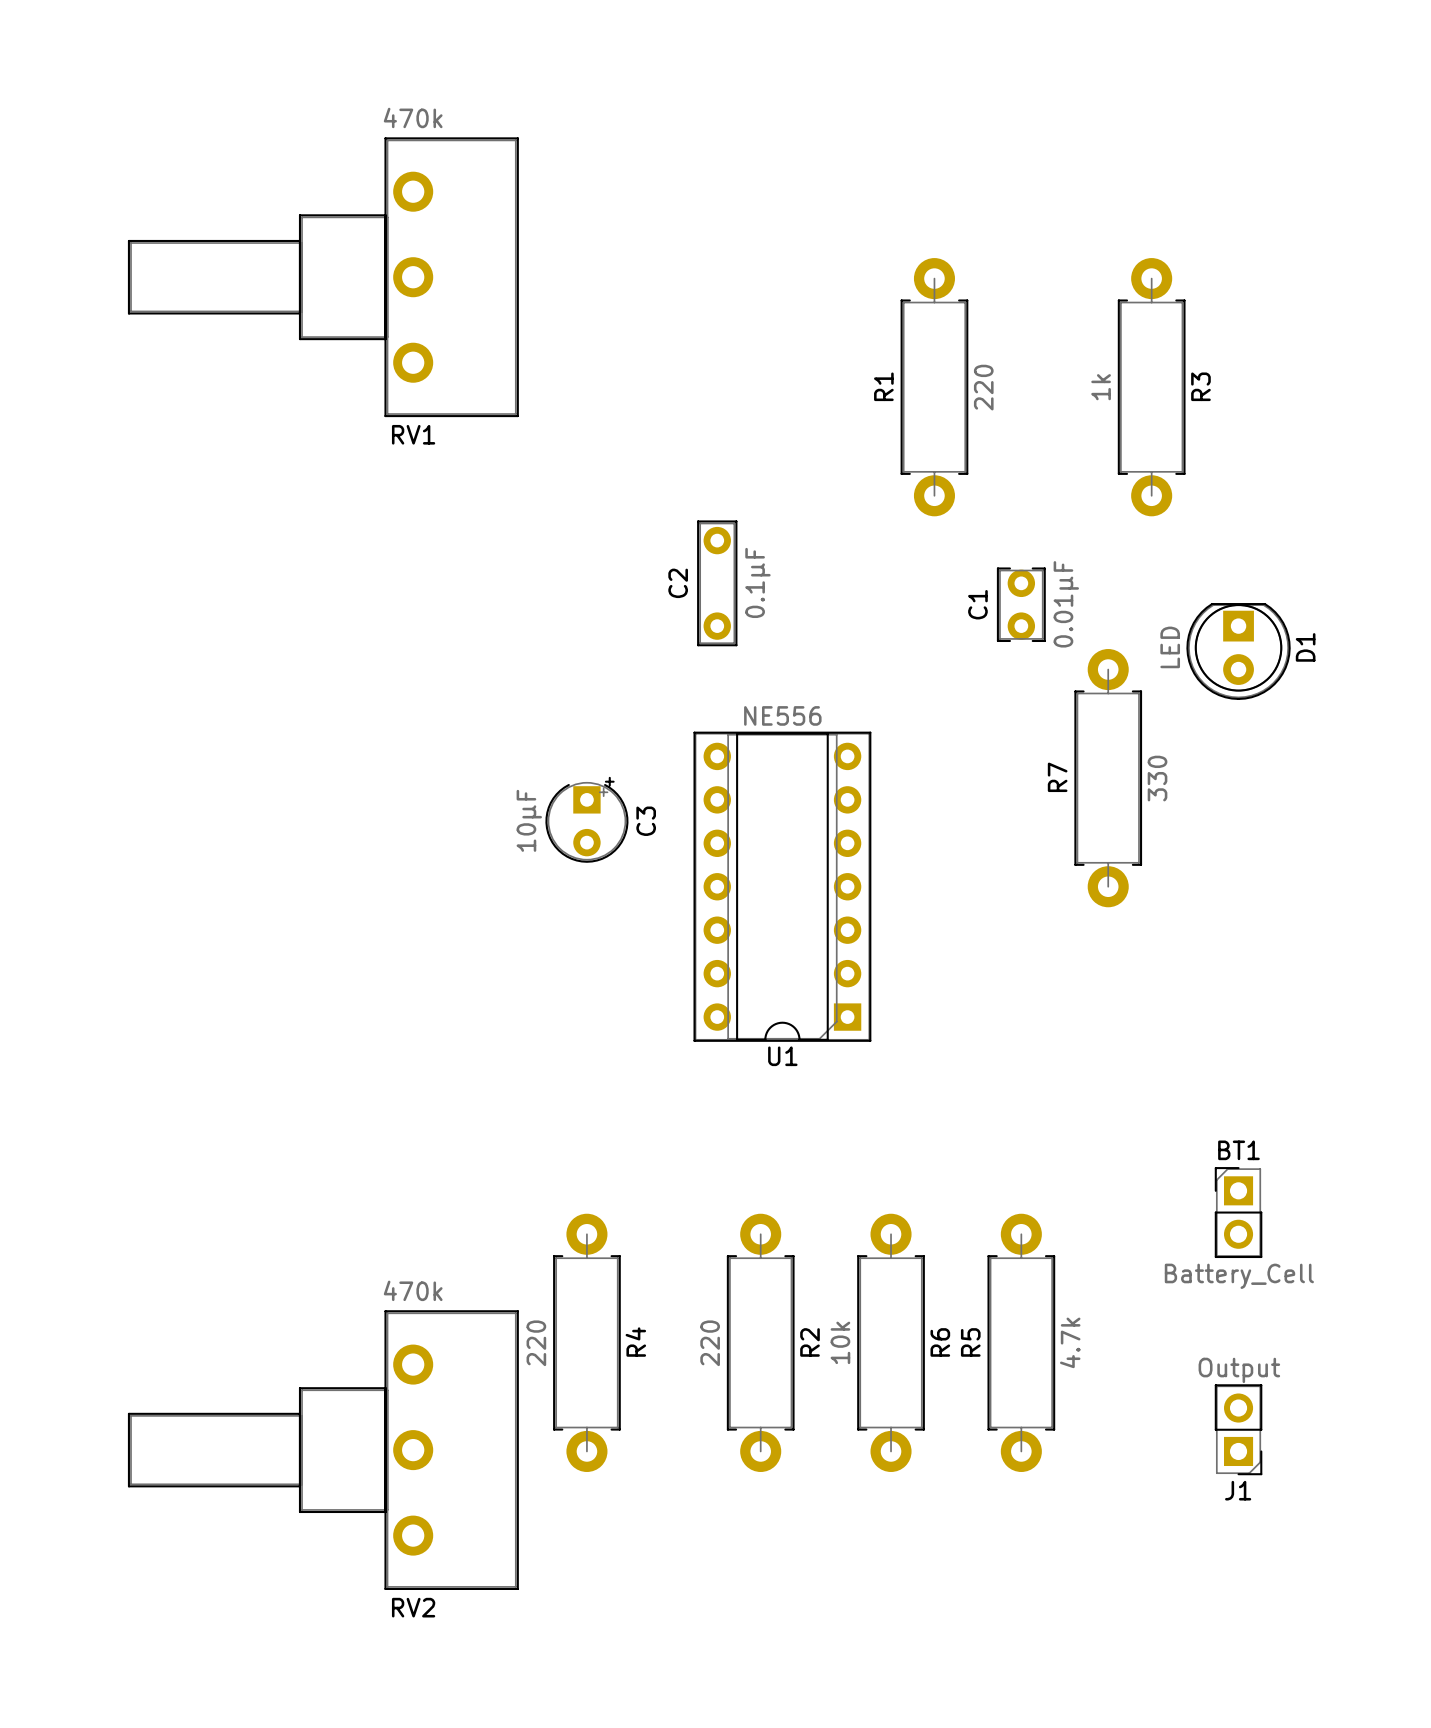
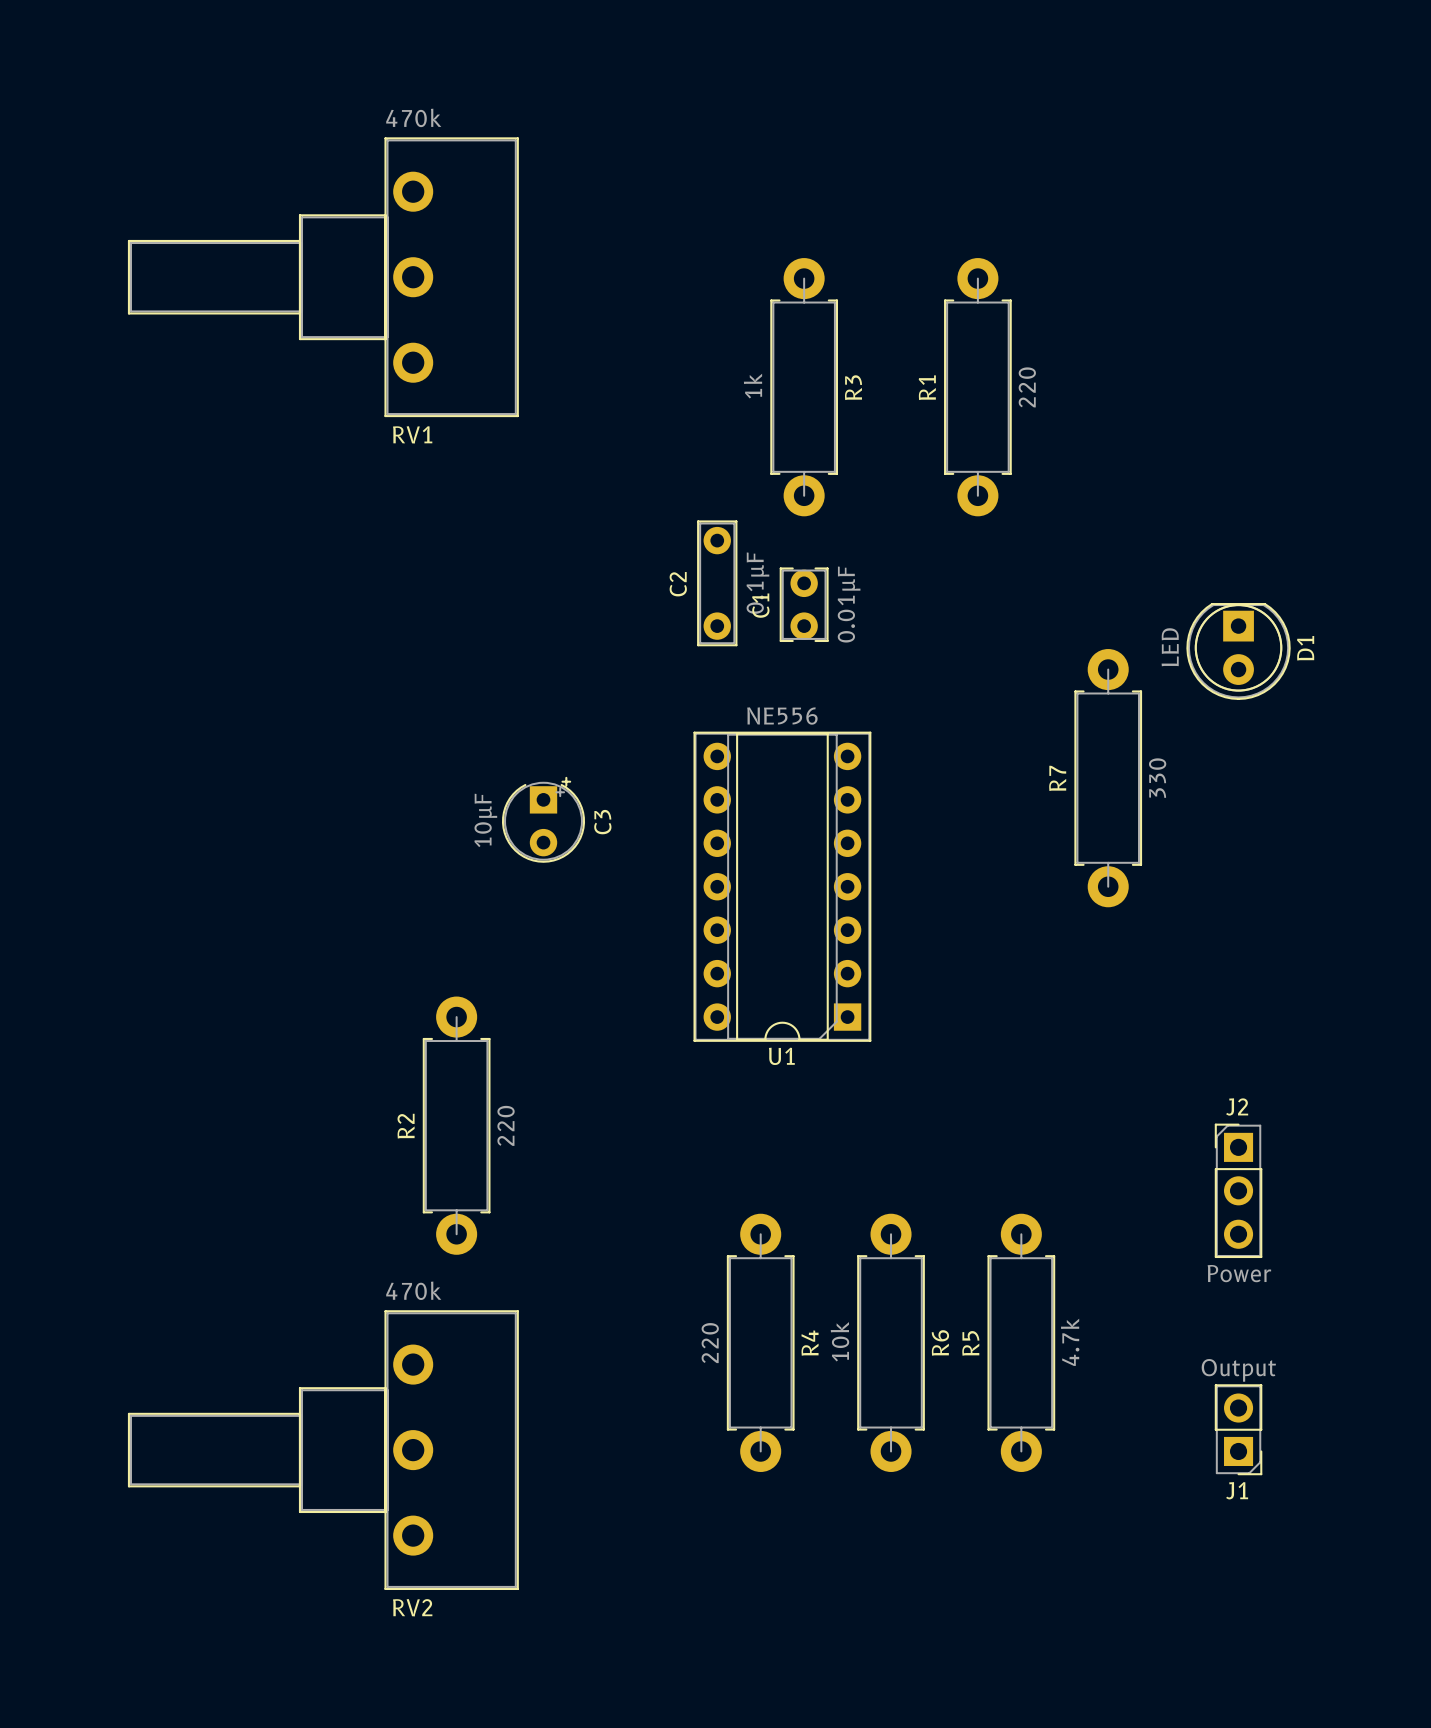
R1 position: (934, 387) -> (977, 387)
R3 position: (1151, 387) -> (804, 387)
C1 position: (1021, 604) -> (804, 604)
C3 position: (586, 819) -> (543, 819)
R2: none -> 220 (456, 1125)
J2: none -> Power (1238, 1190)
BT1: Battery_Cell (1238, 1212) -> none
R4: 220 (586, 1342) -> none
R2 name: R2 (810, 1342) -> R4 (810, 1343)

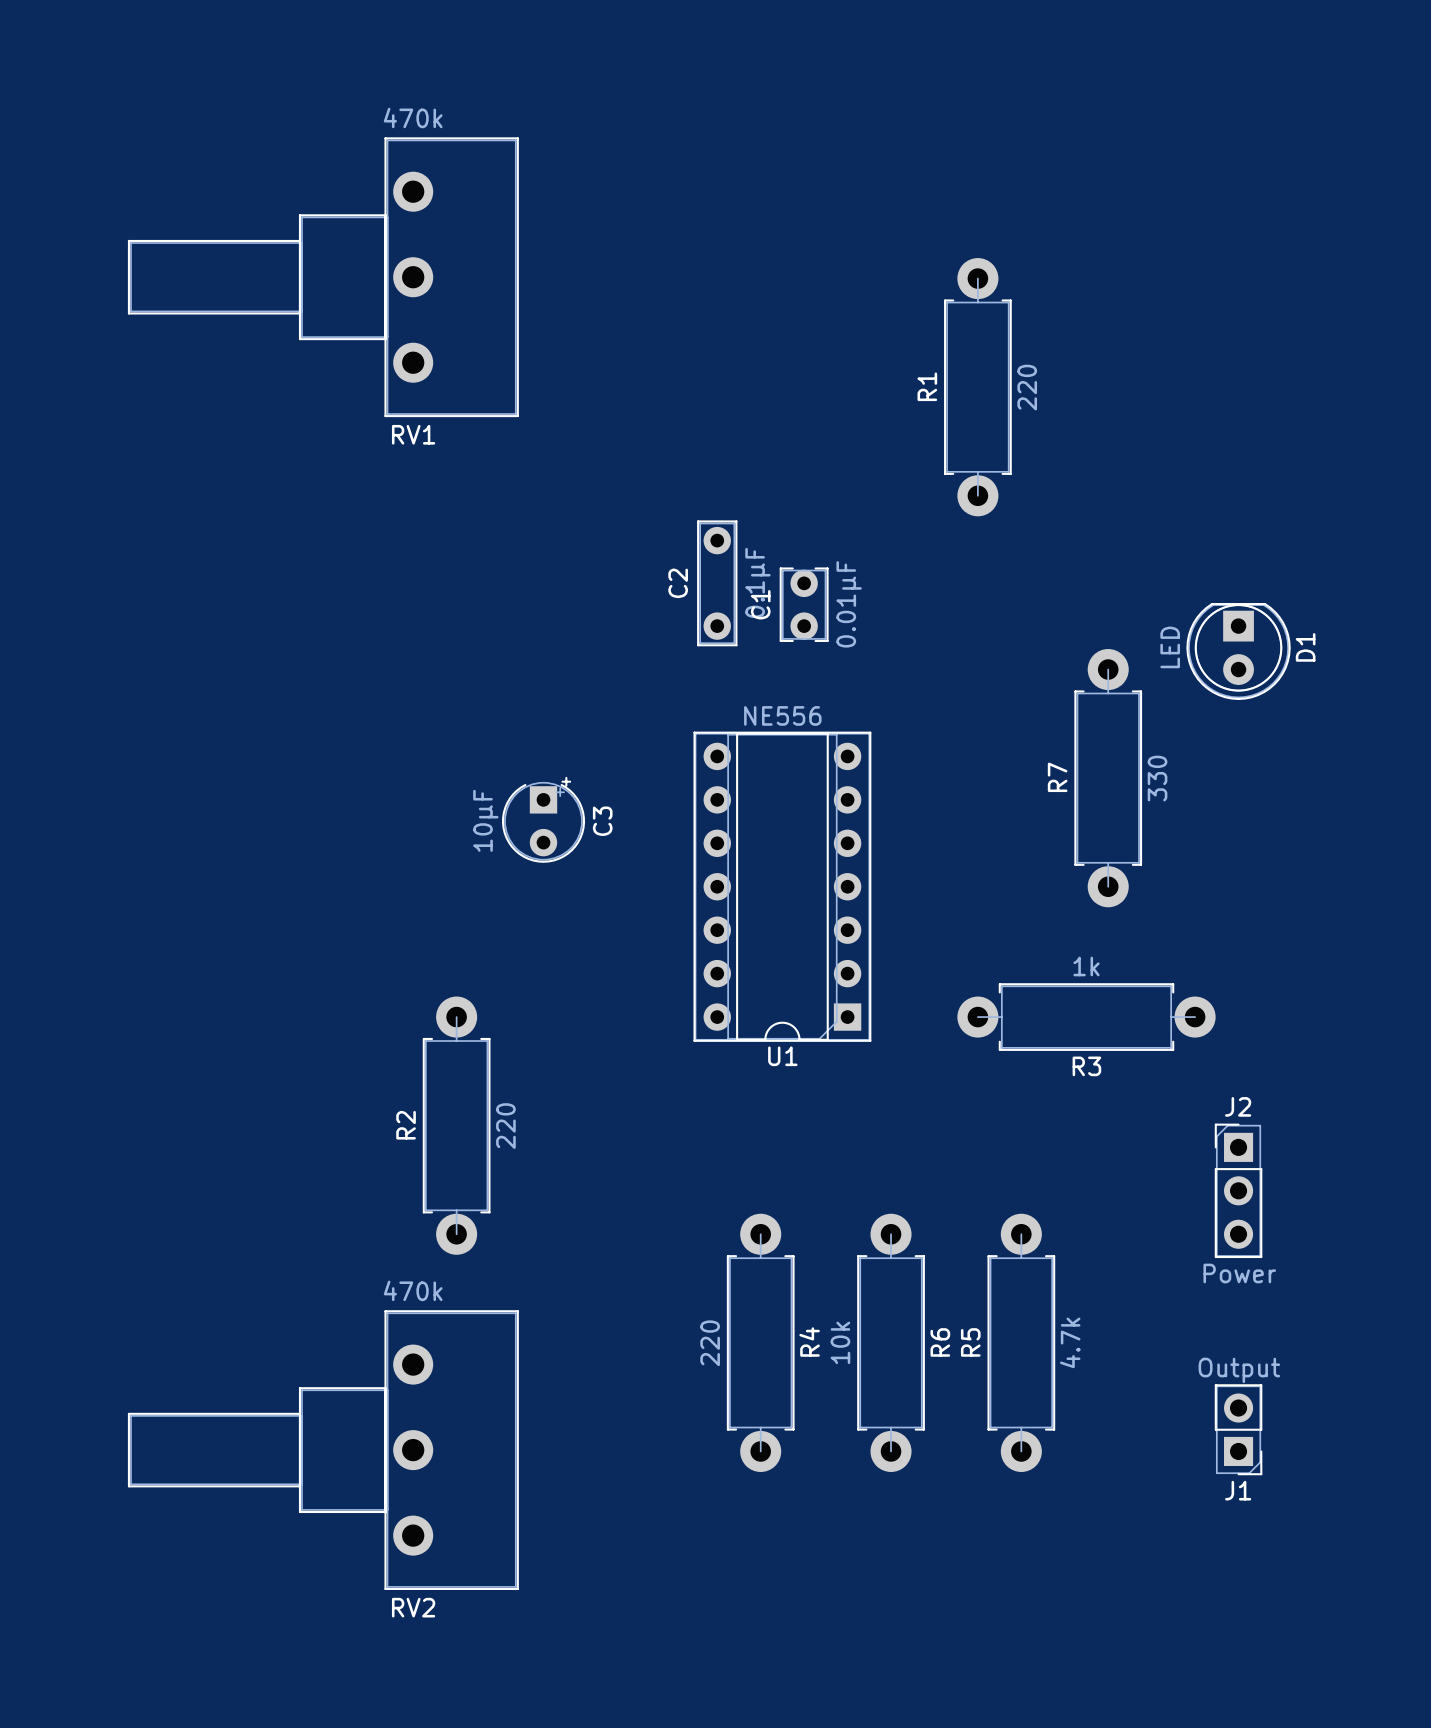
R3 rotation: 0° (804, 387) -> 90° clockwise (1086, 1017)
R3 position: (804, 387) -> (1086, 1017)

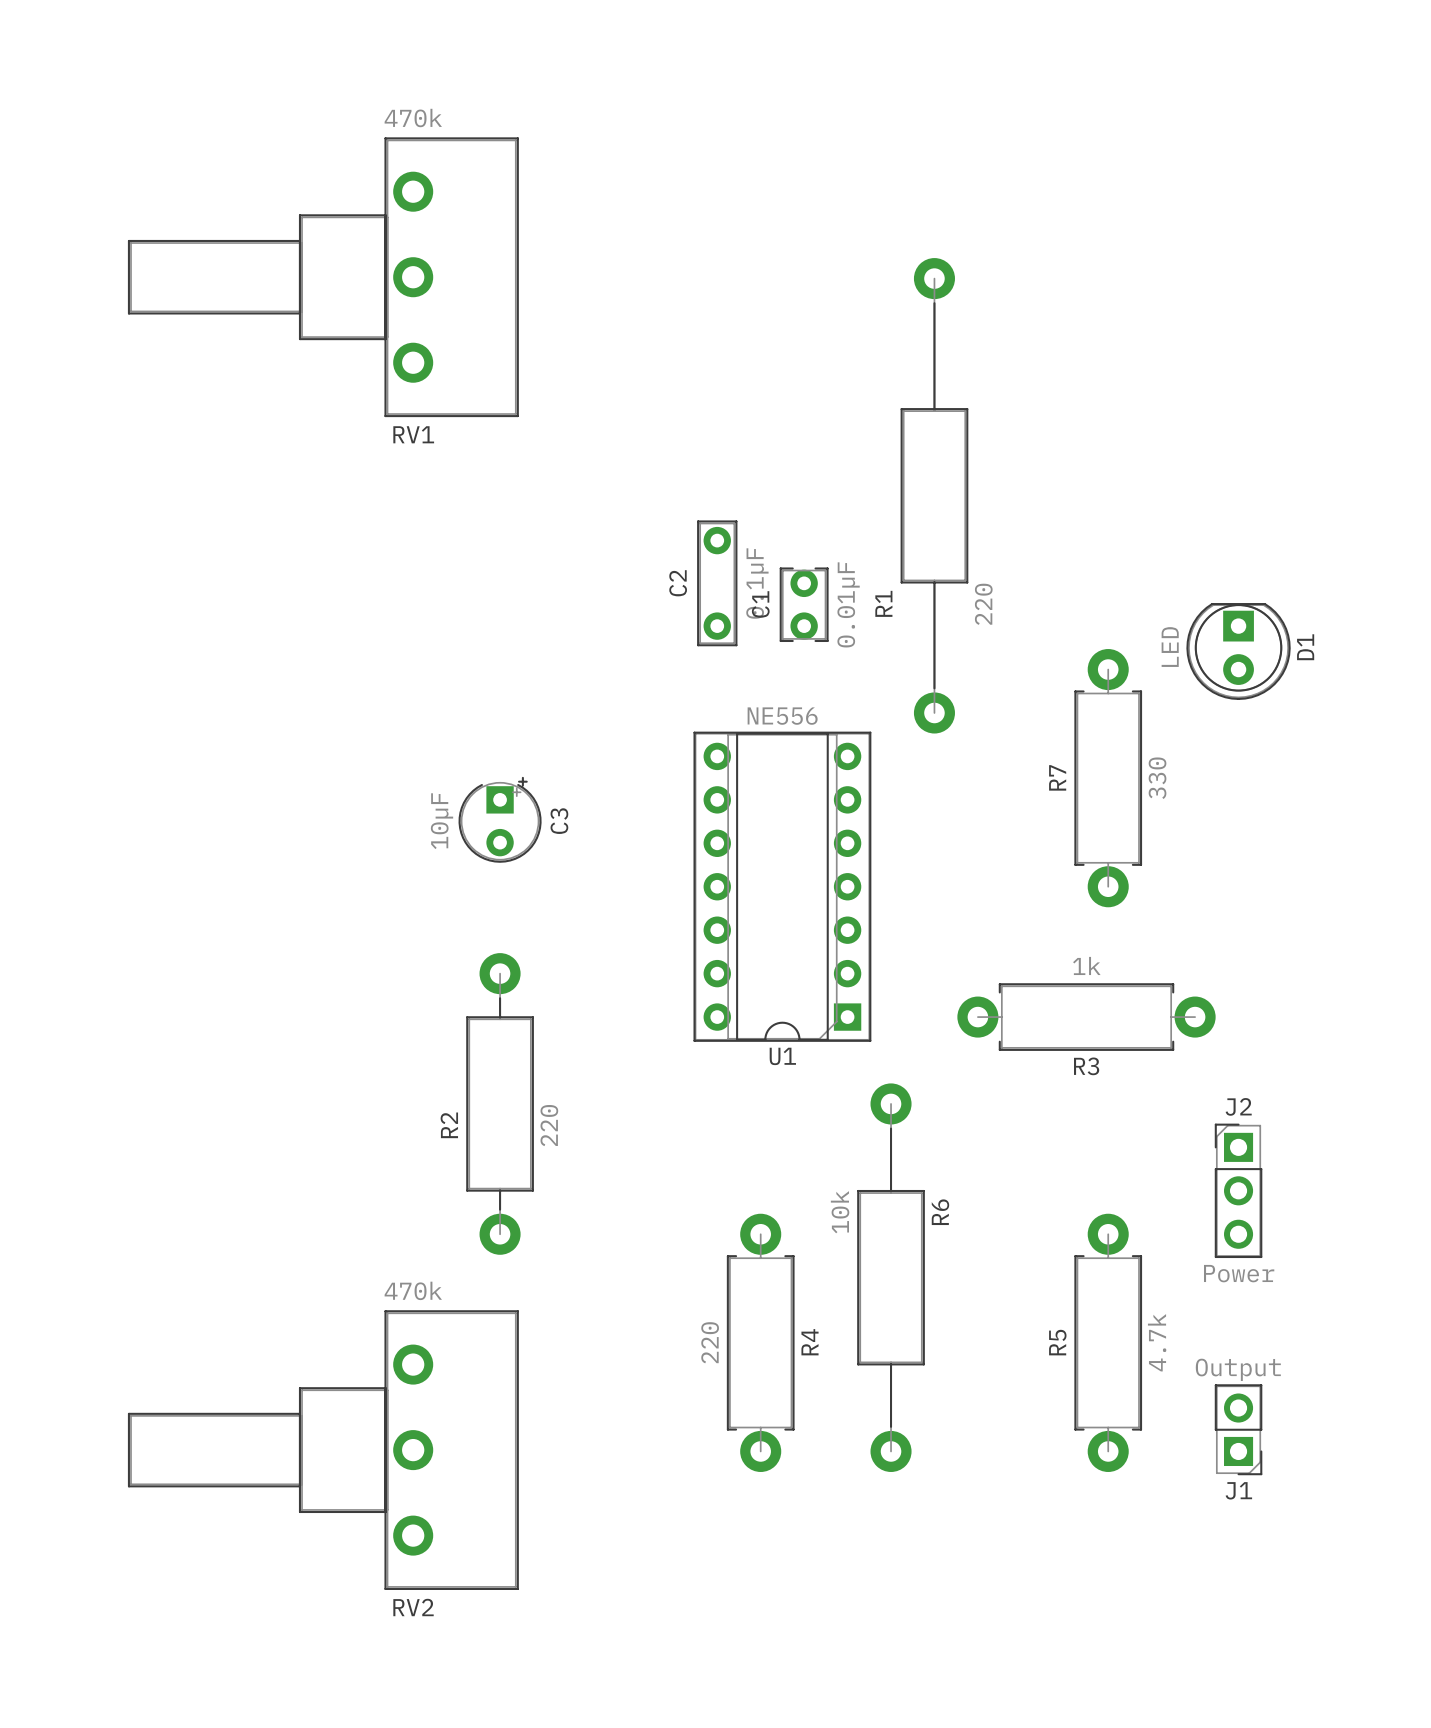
R1 footprint: [944, 258, 1012, 517] -> [900, 258, 969, 734]
R1 name position: R1 (927, 386) -> R1 (883, 603)
R1 value position: 220 (1027, 387) -> 220 (983, 604)
C3 position: (543, 819) -> (500, 819)
R2 footprint: [422, 996, 491, 1255] -> [466, 953, 534, 1255]
R6 footprint: [857, 1213, 925, 1472] -> [857, 1083, 925, 1472]
R6 value position: 10k (840, 1342) -> 10k (840, 1212)
R6 name position: R6 (940, 1342) -> R6 (940, 1212)
R5 position: (1021, 1342) -> (1108, 1342)

